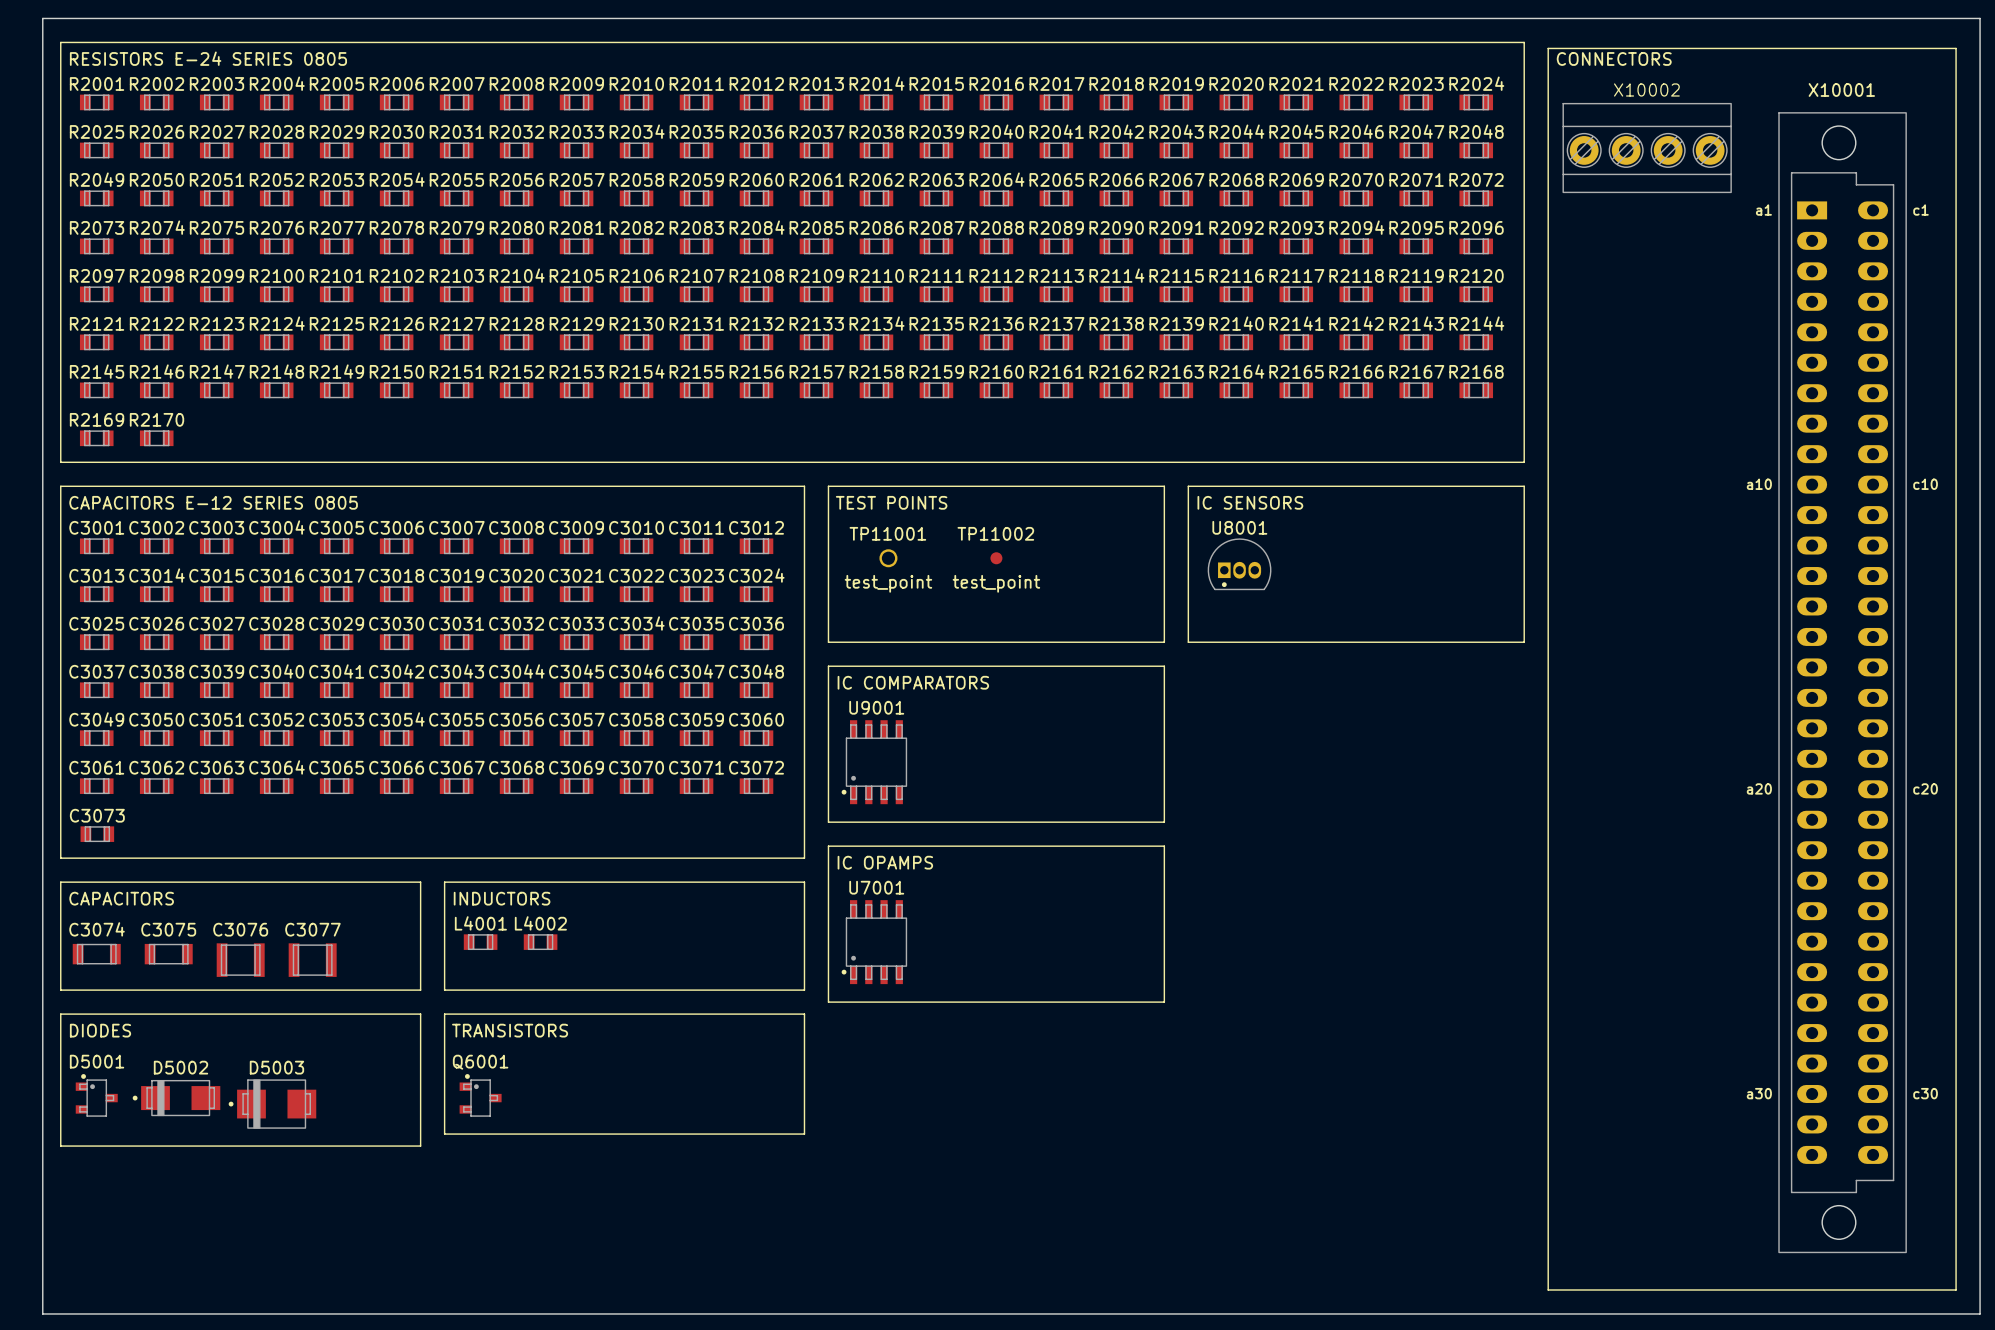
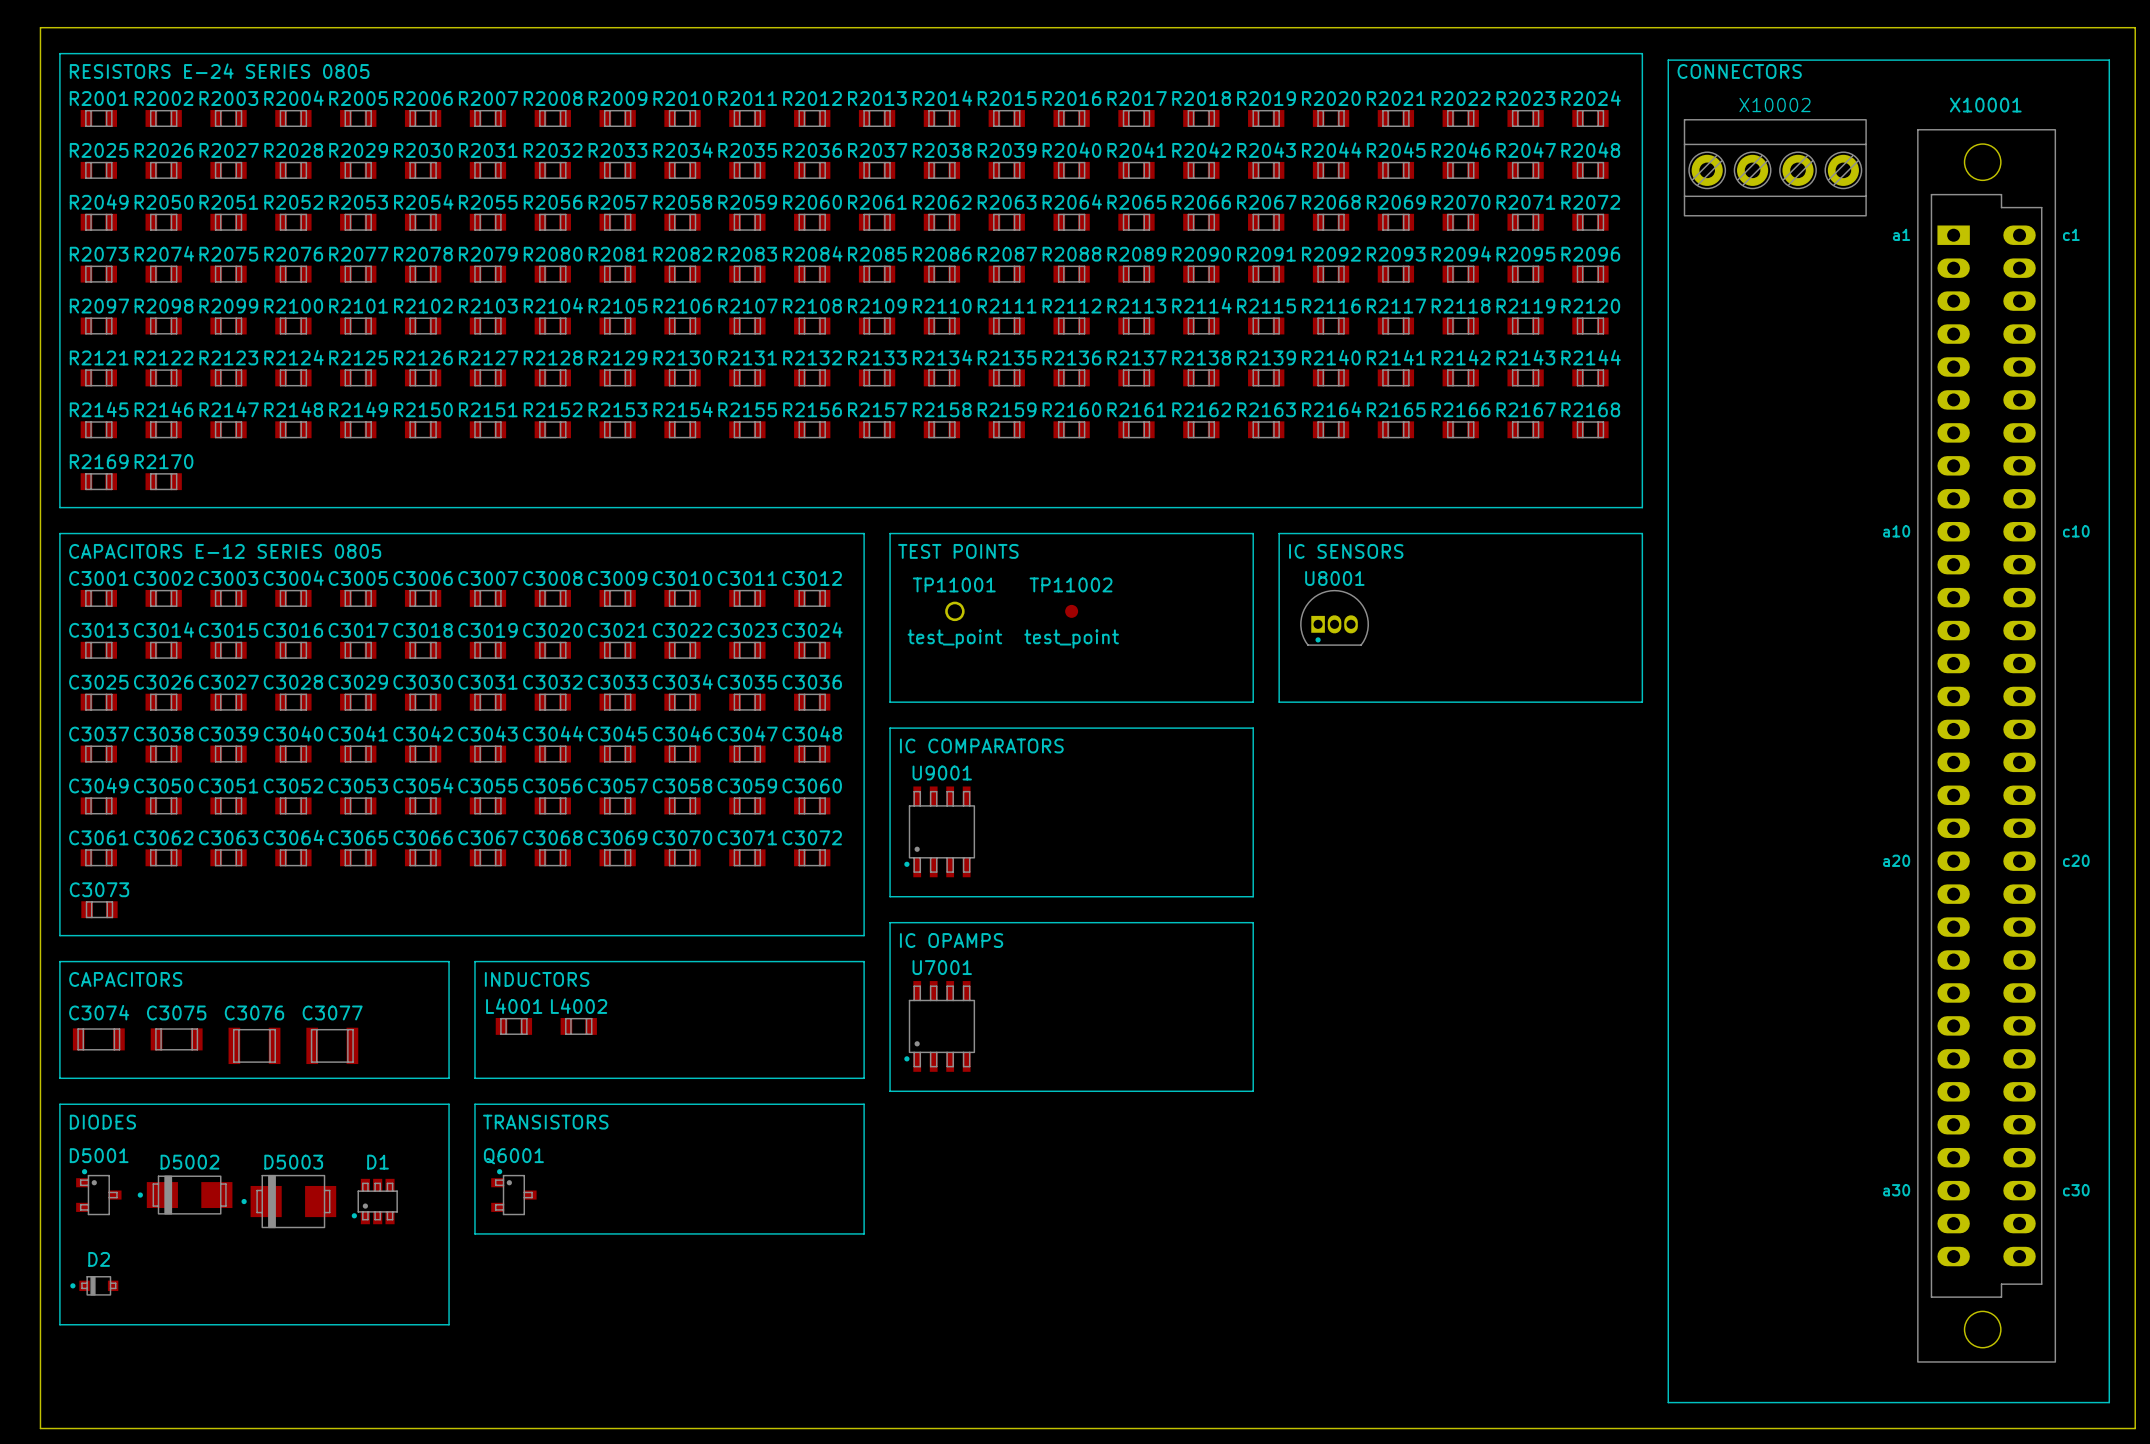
D1: none -> (374, 1201)
line: (60, 1146) (420, 1146) -> (59, 1246) (59, 1324) (449, 1324) (449, 1246)
D2: none -> (94, 1285)

